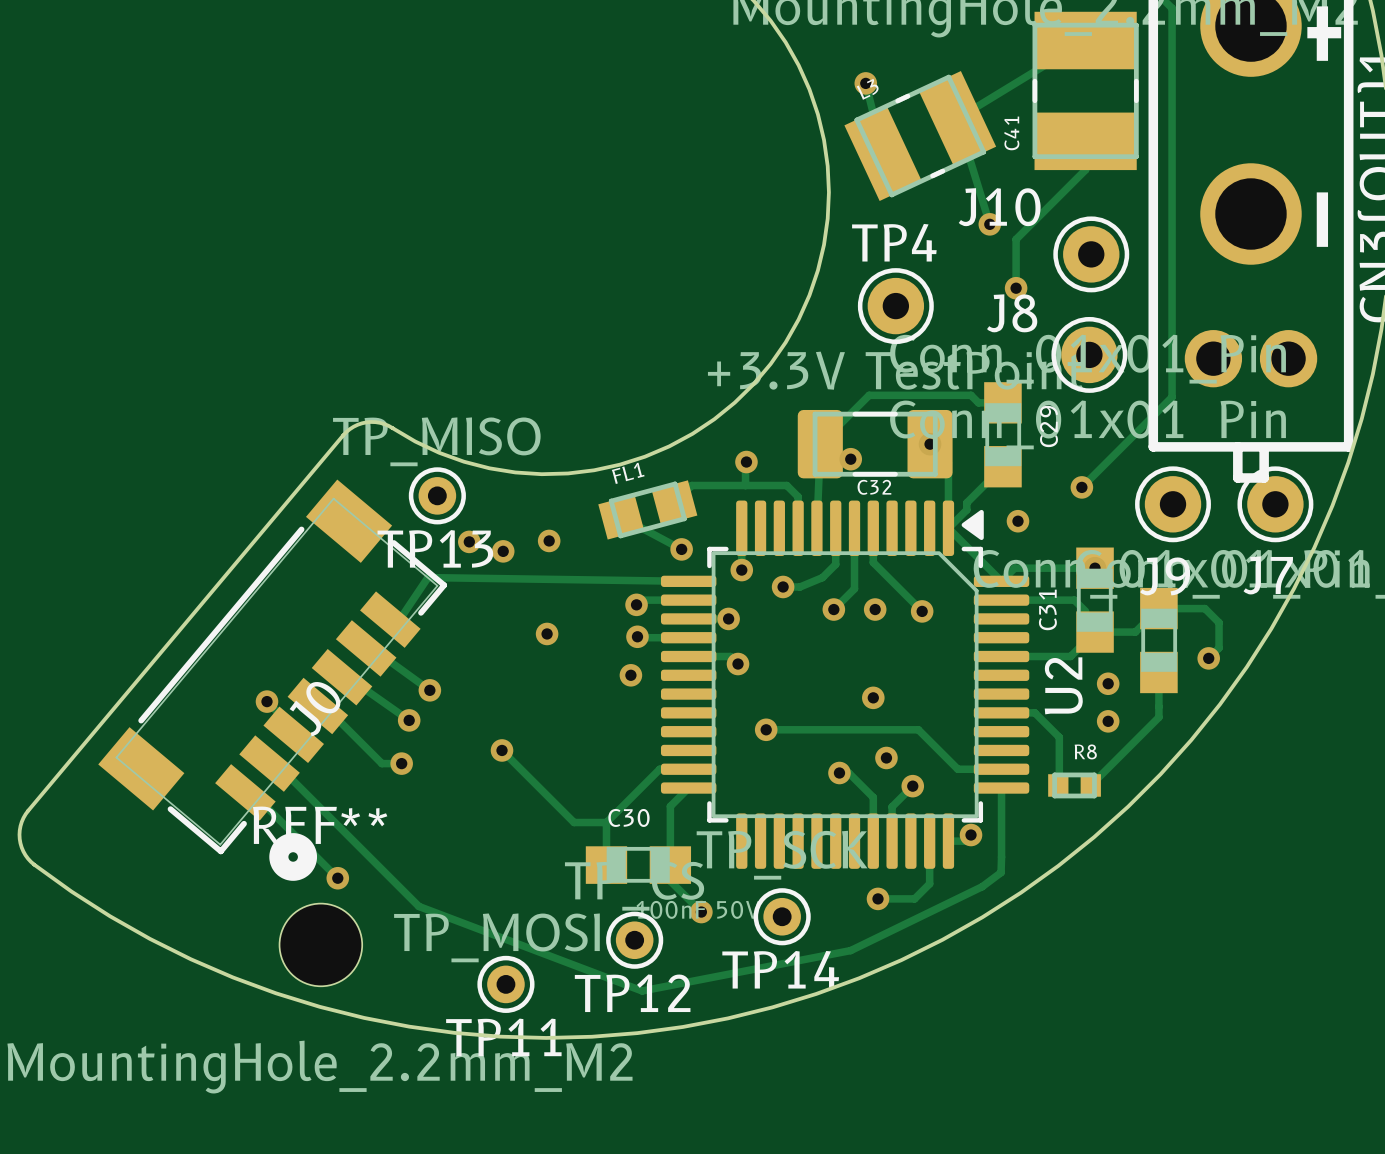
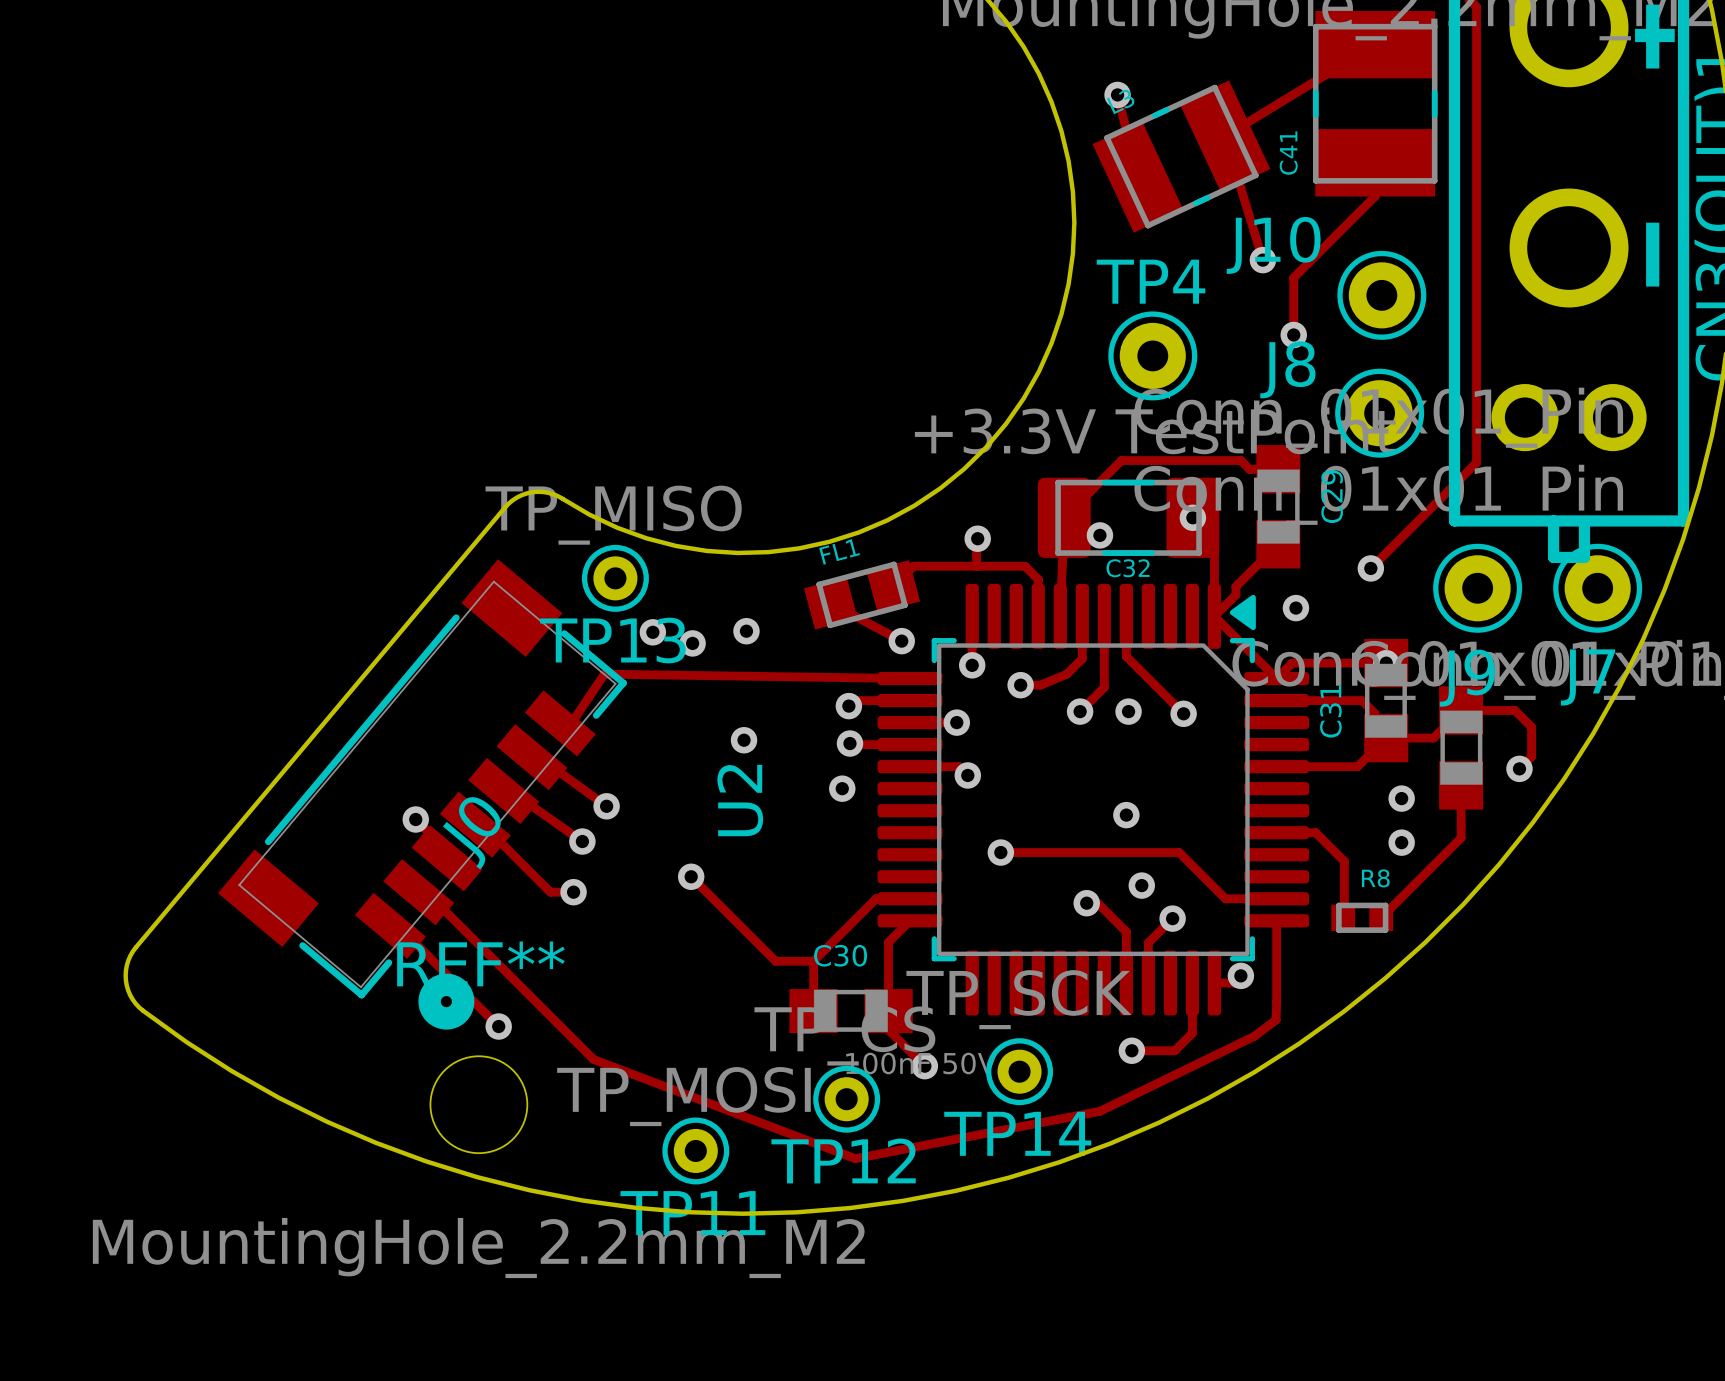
U2 name position: U2 (1063, 685) -> U2 (740, 800)

